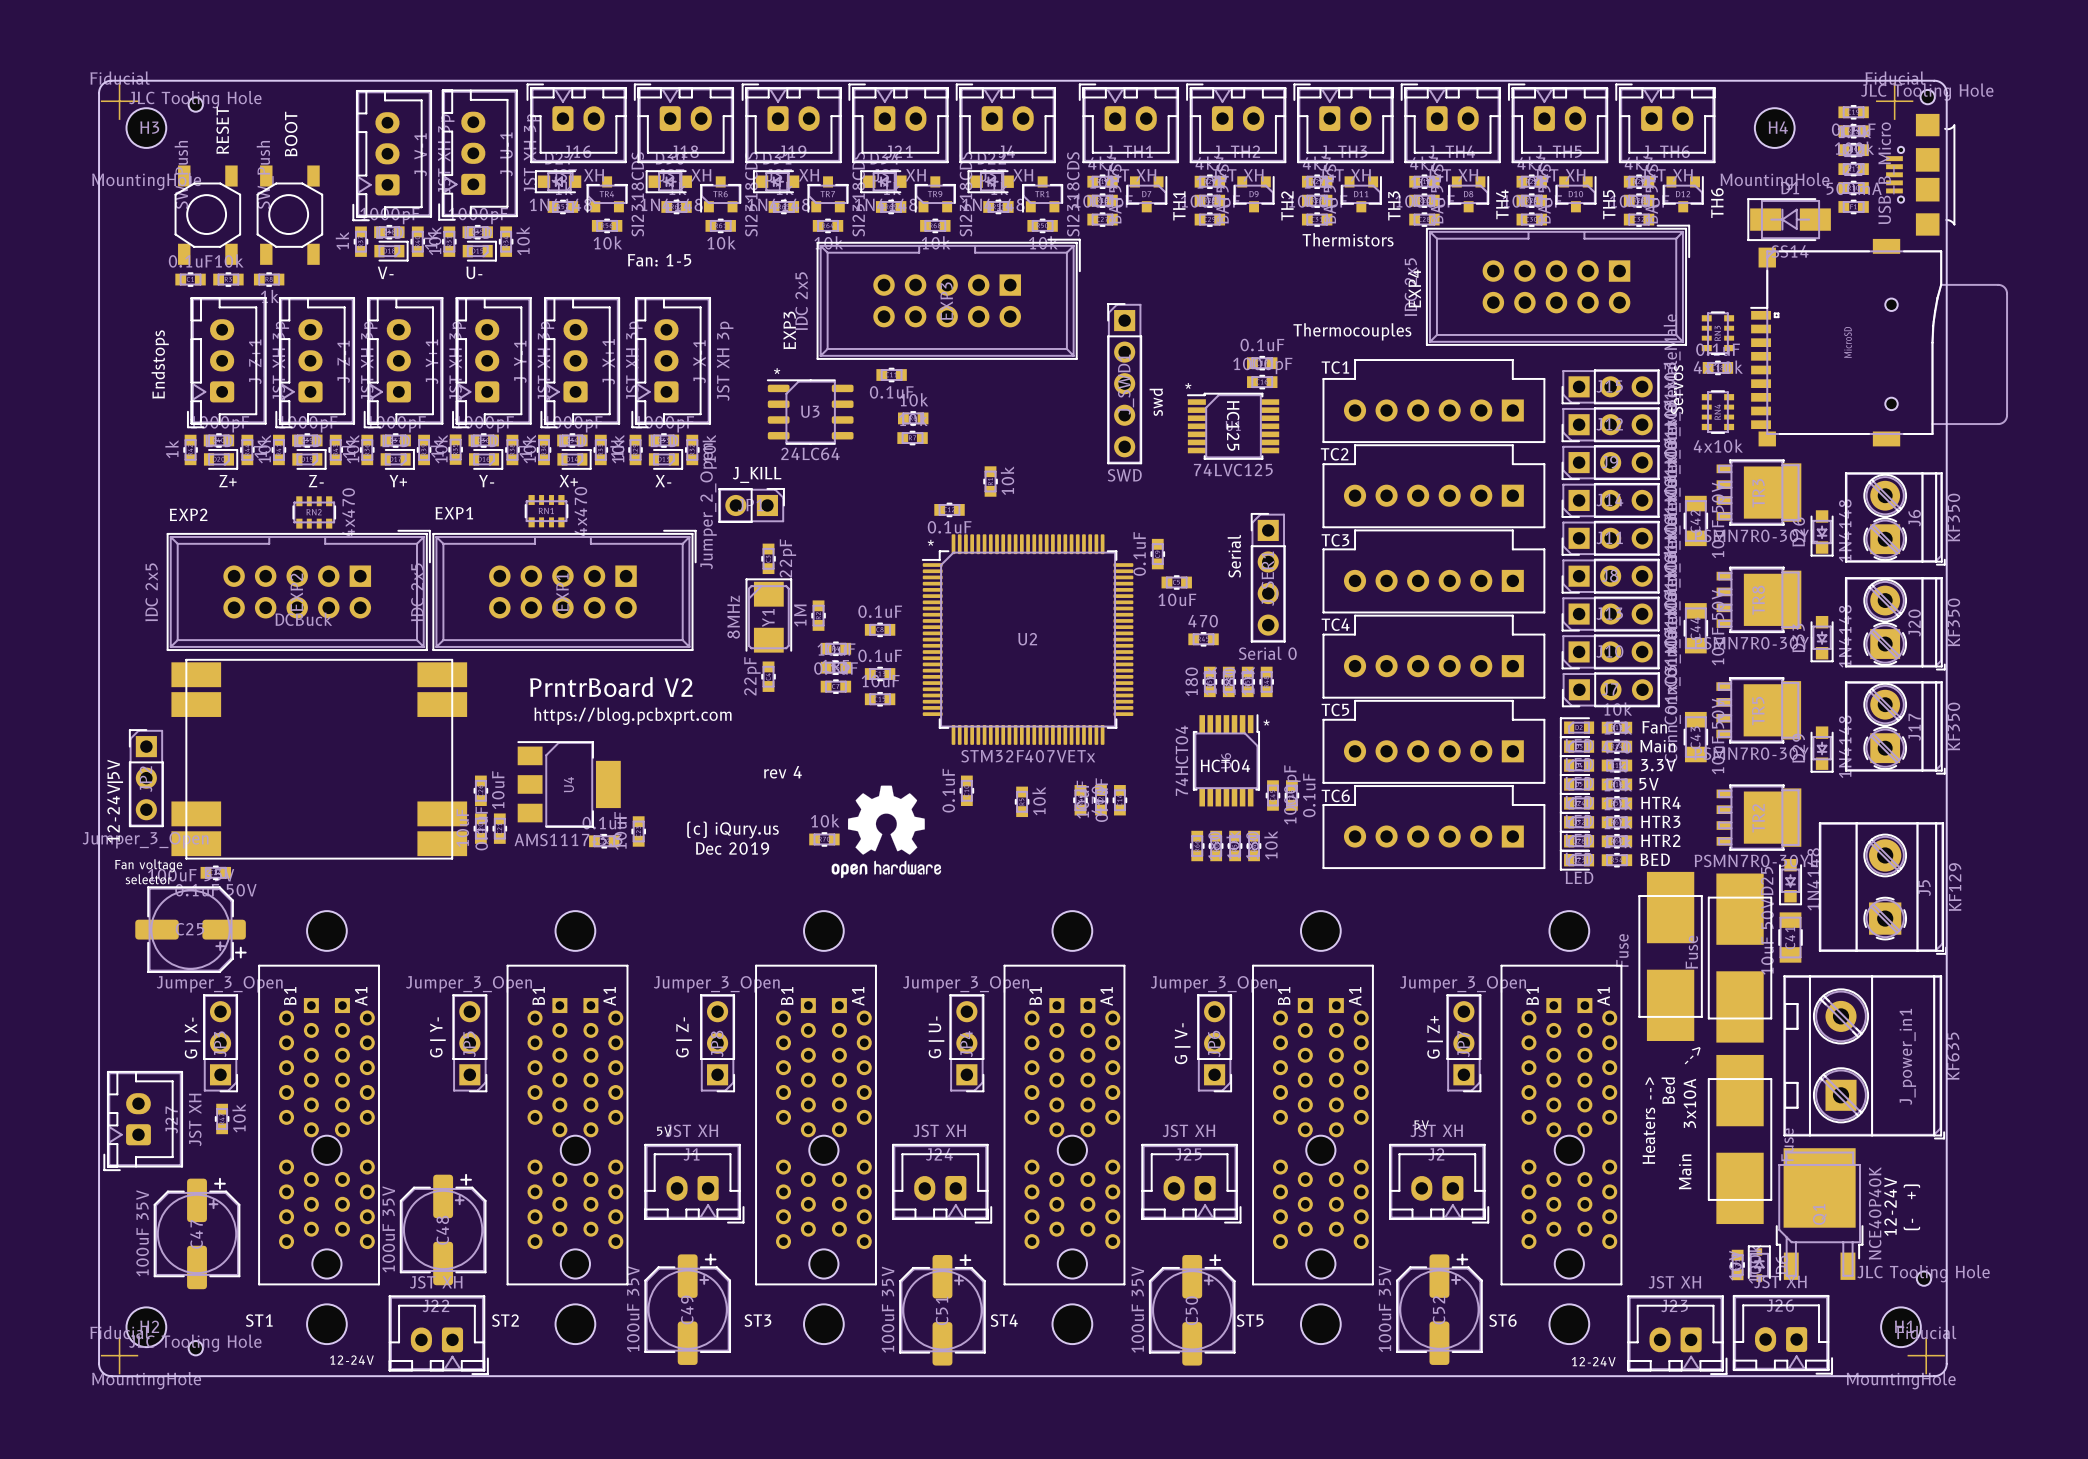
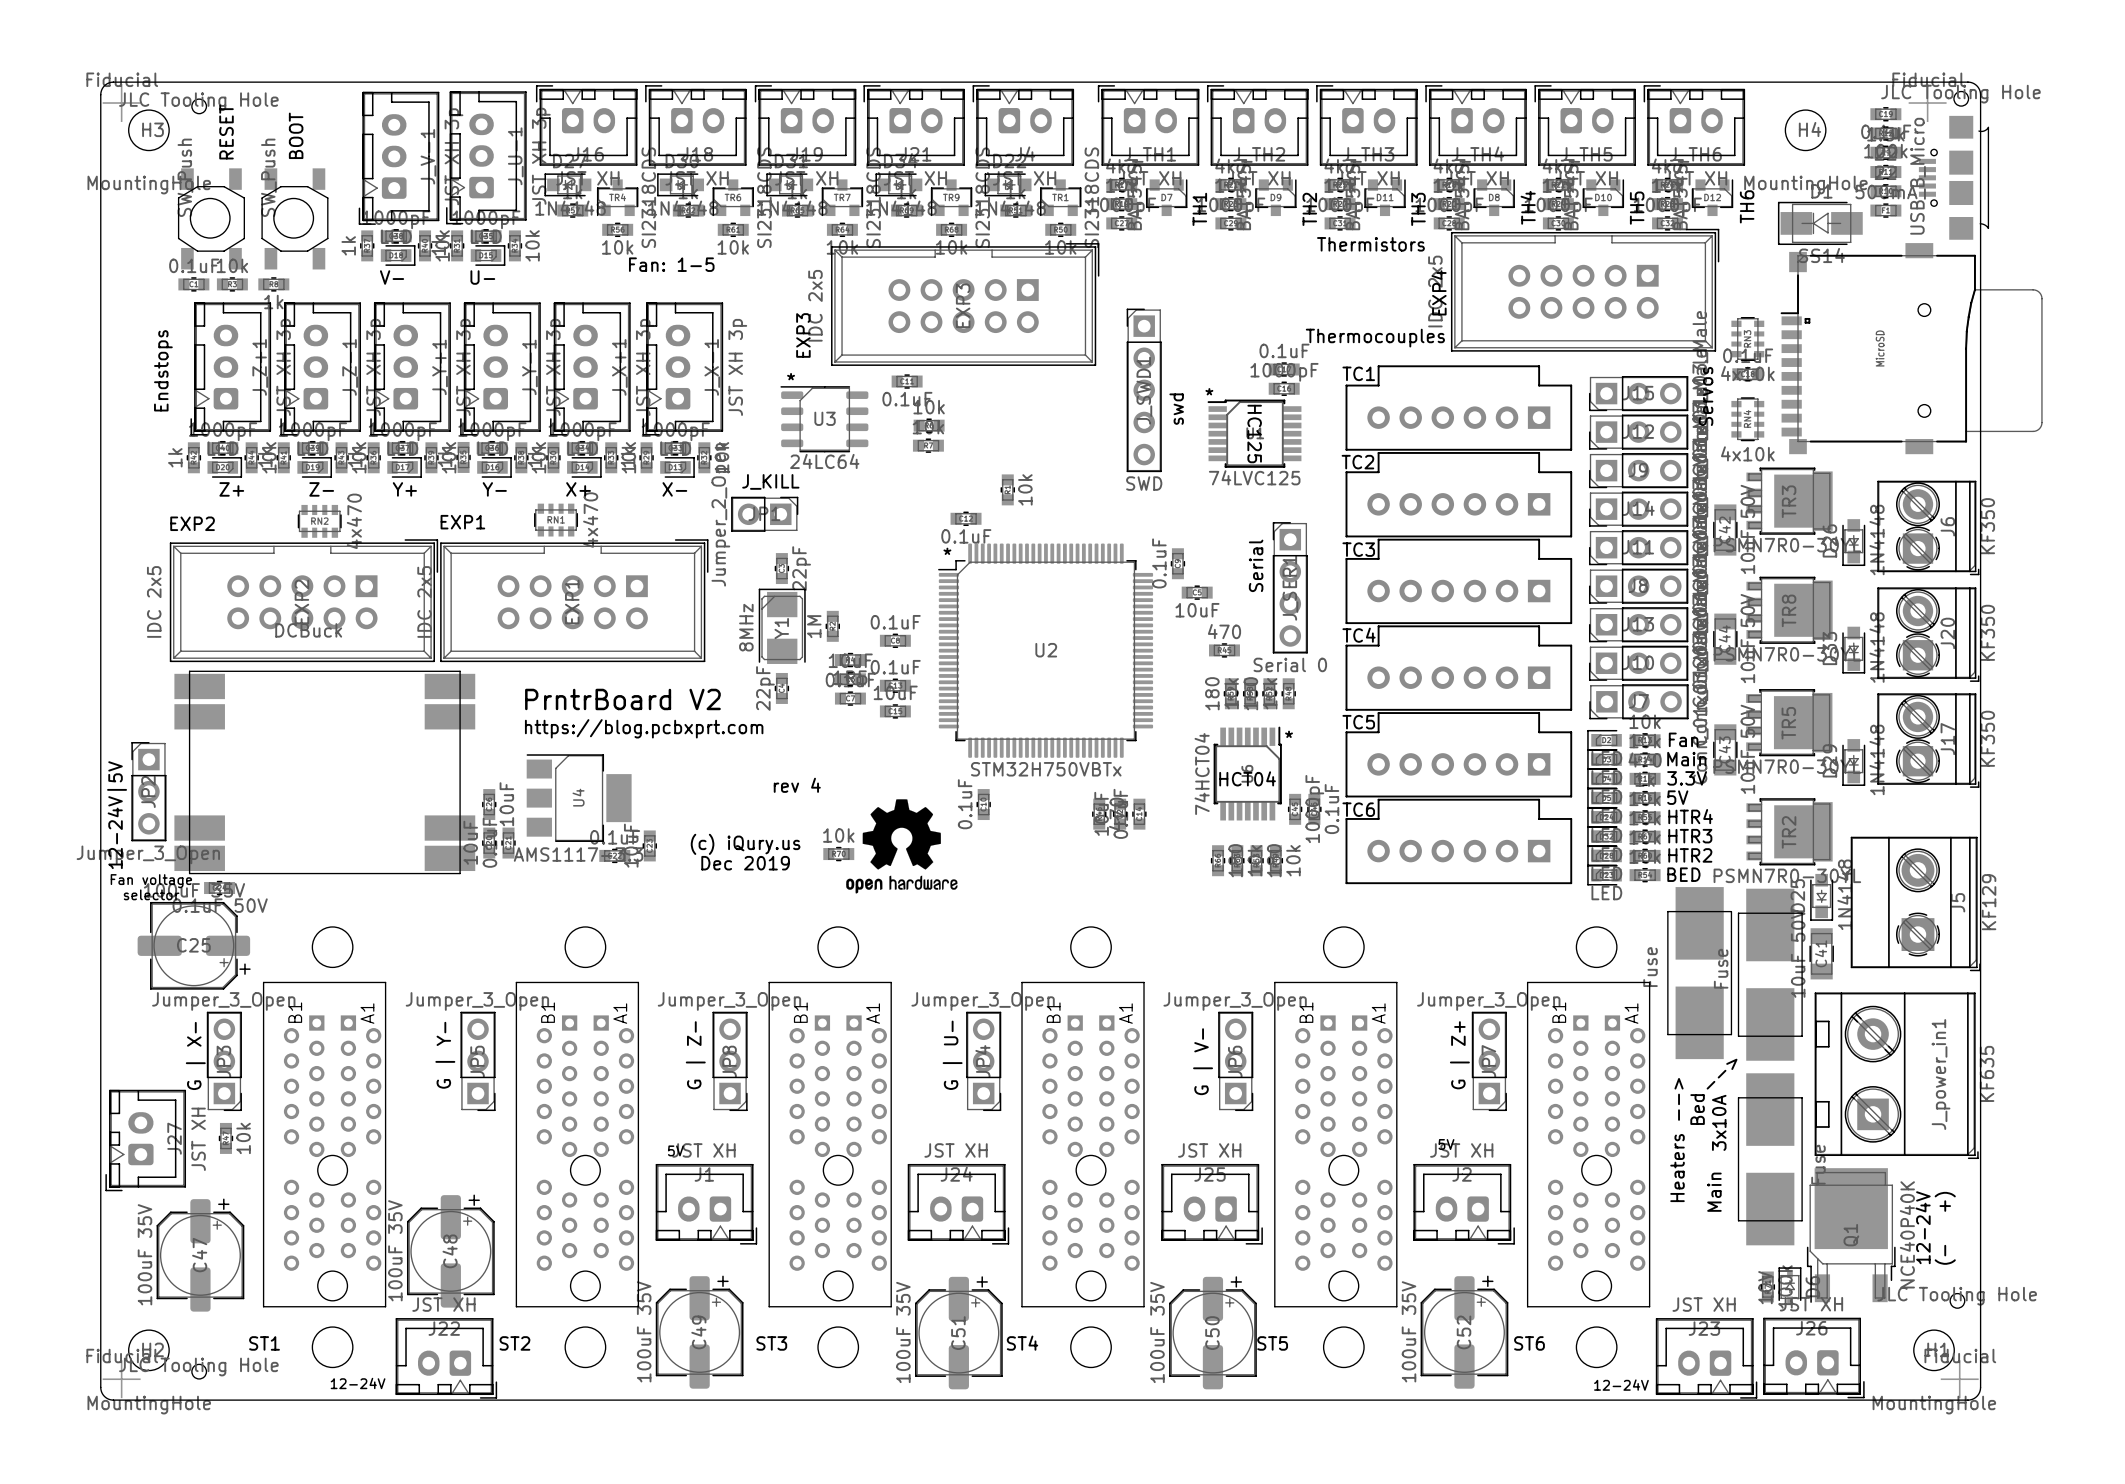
U2 value: STM32F407VETx (1028, 756) -> STM32H750VBTx (1046, 769)
part: 10k (1022, 801) -> none

